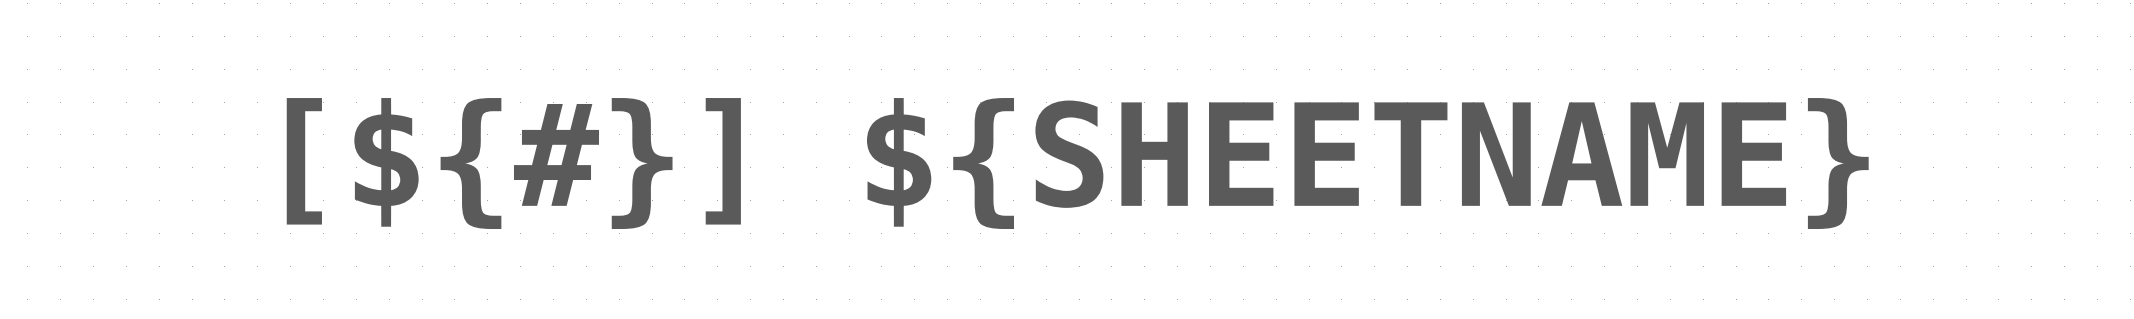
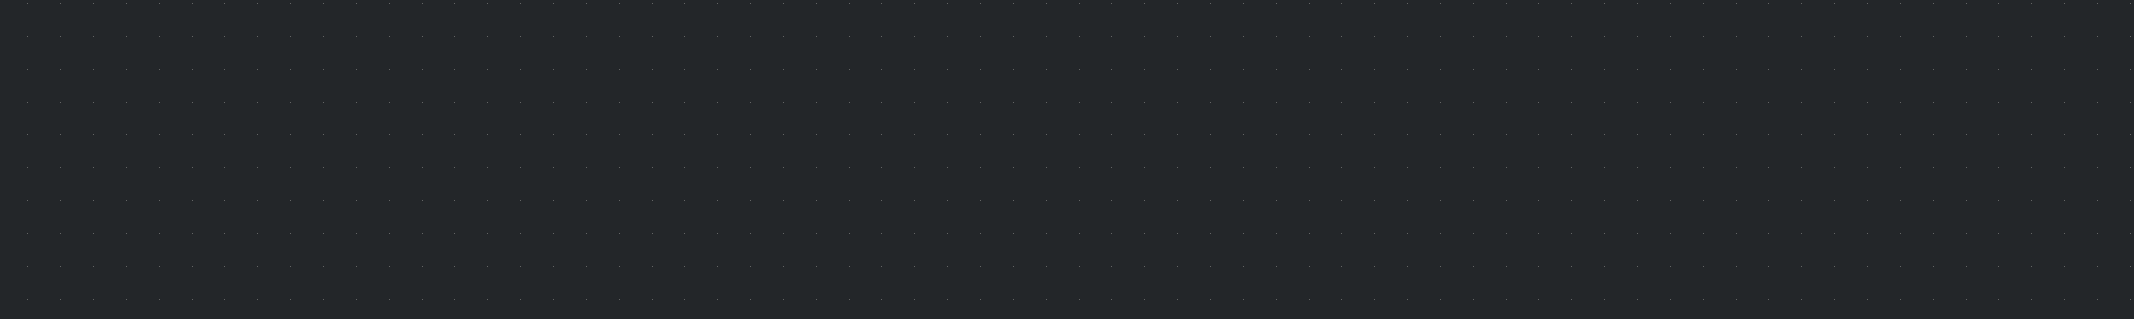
text: [${#}] ${SHEETNAME} (1077, 163) -> none

